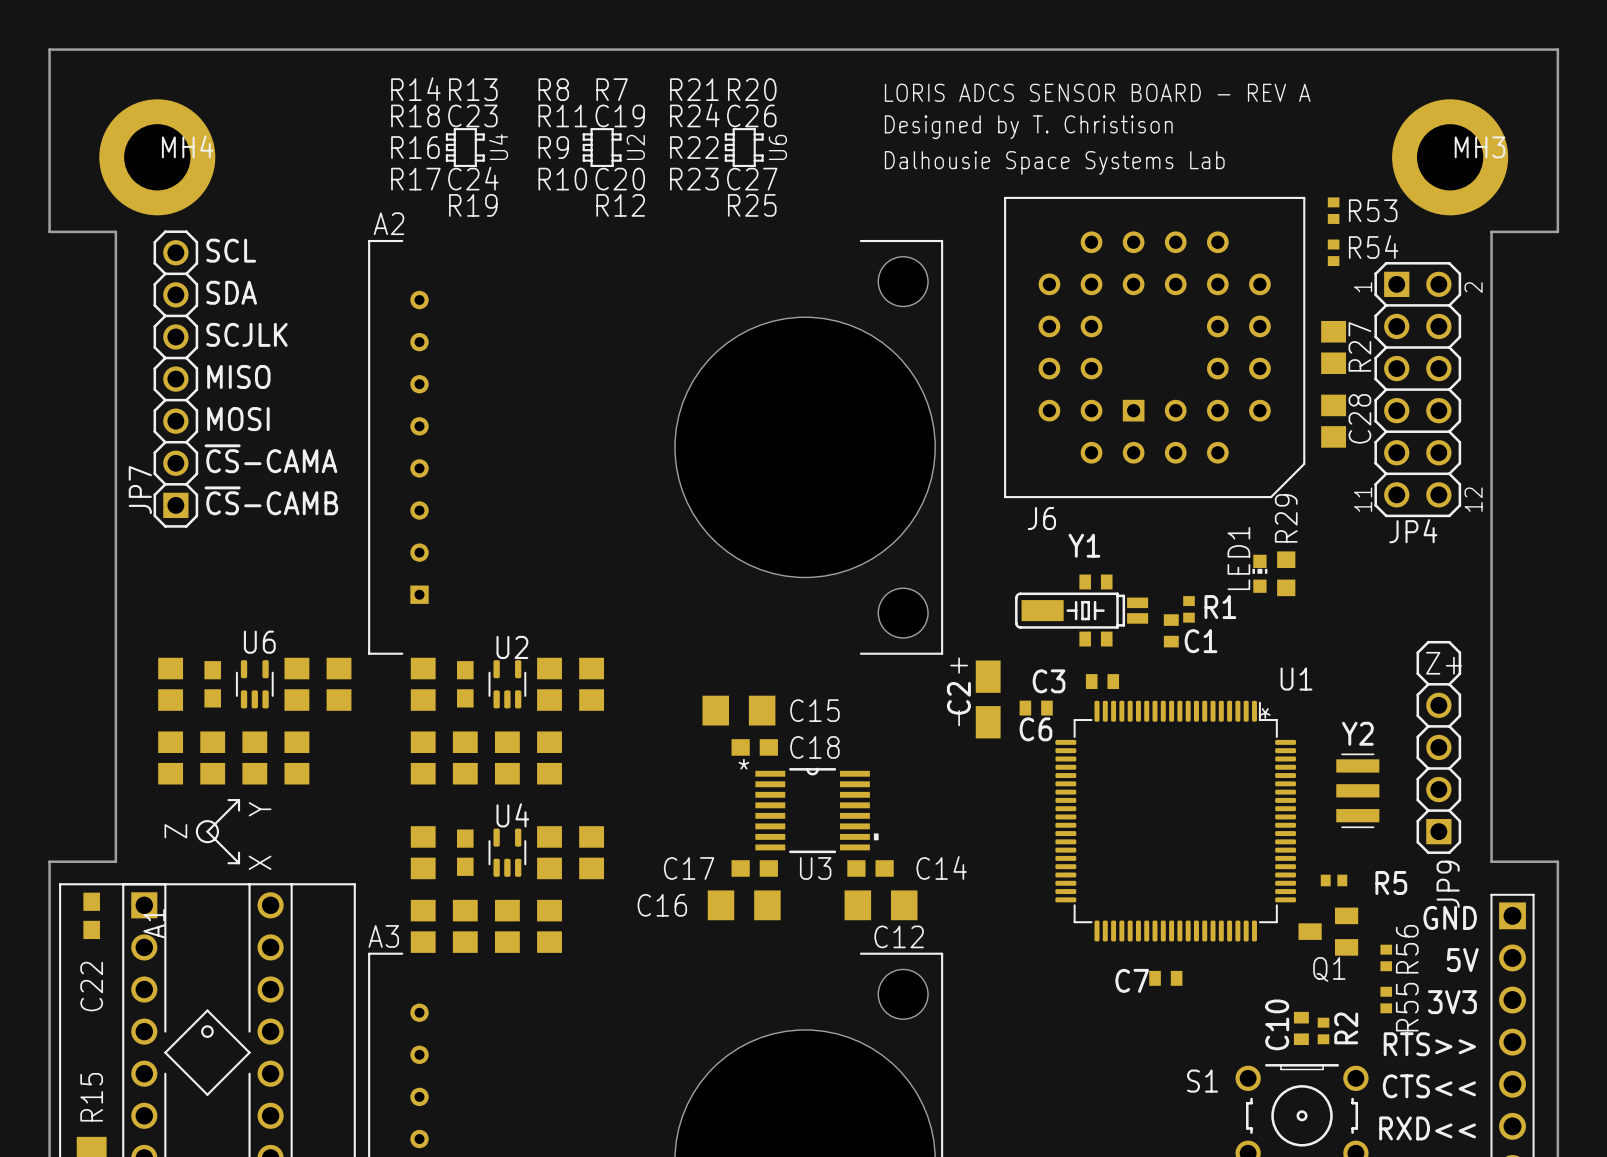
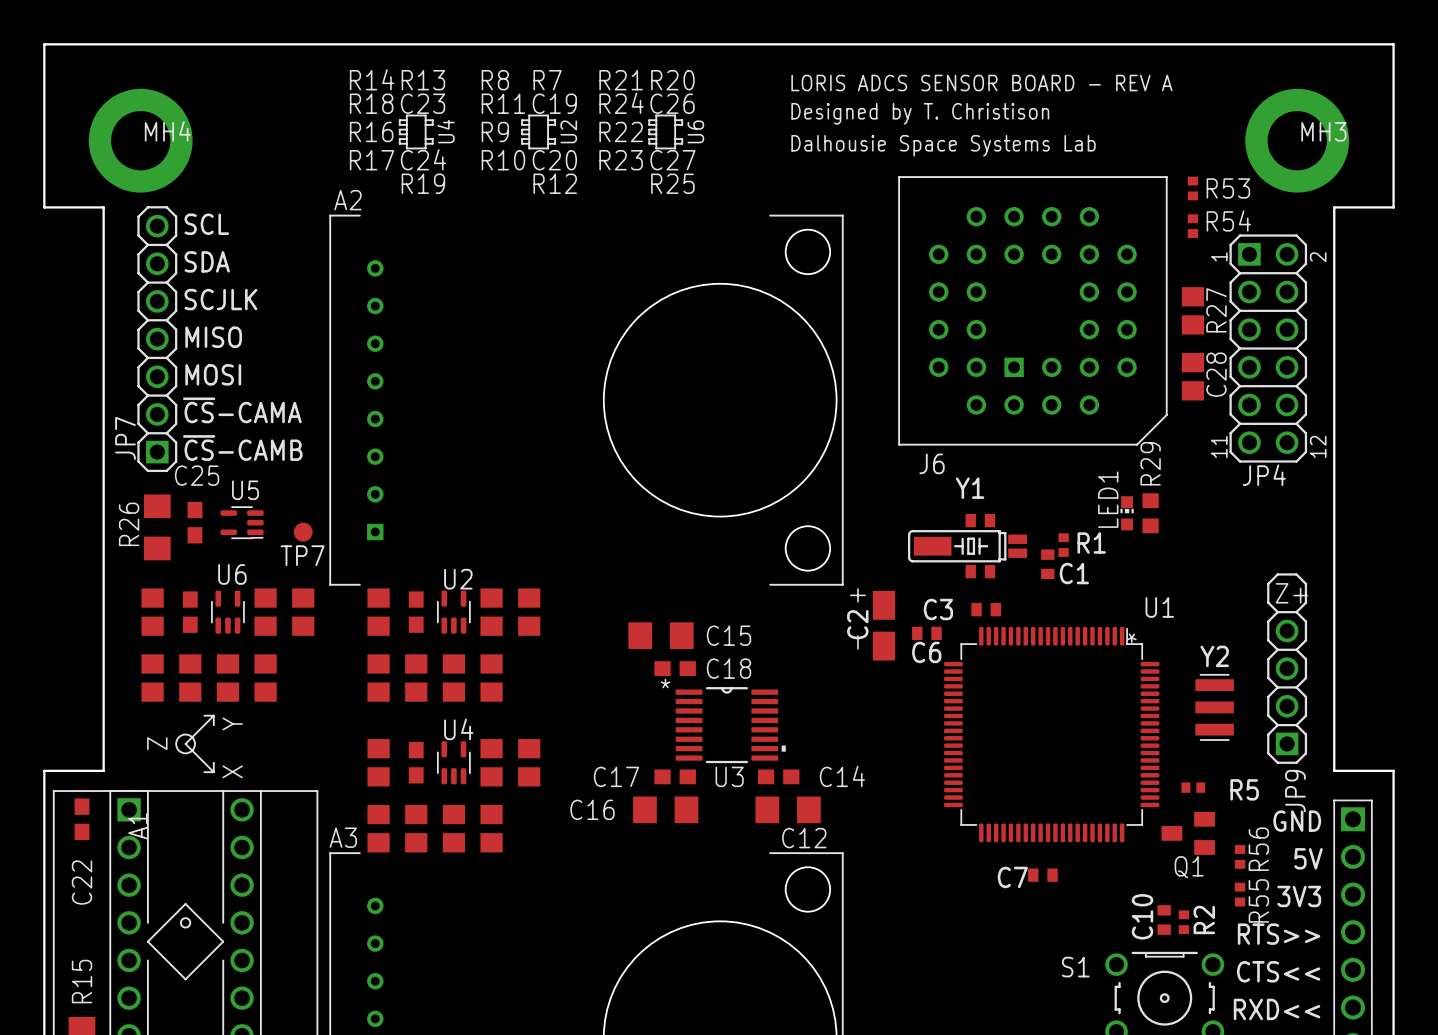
C25: none -> (194, 522)
U5: none -> (242, 522)
R26: none -> (157, 527)
TP7: none -> (303, 532)

